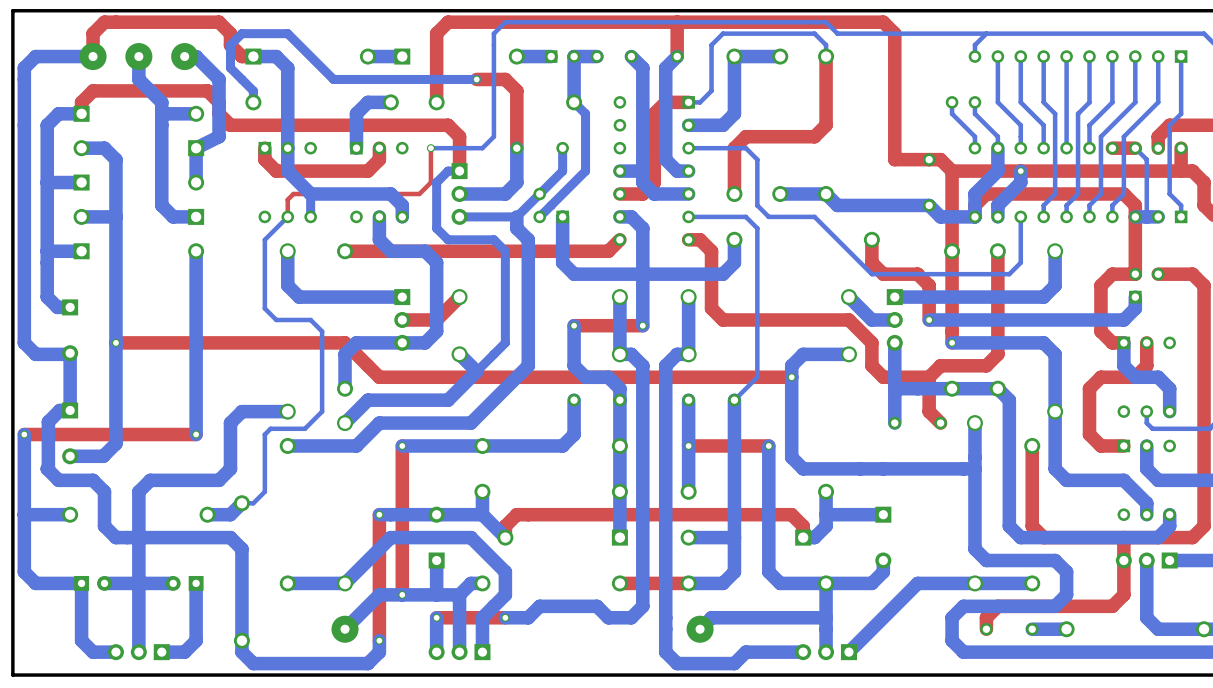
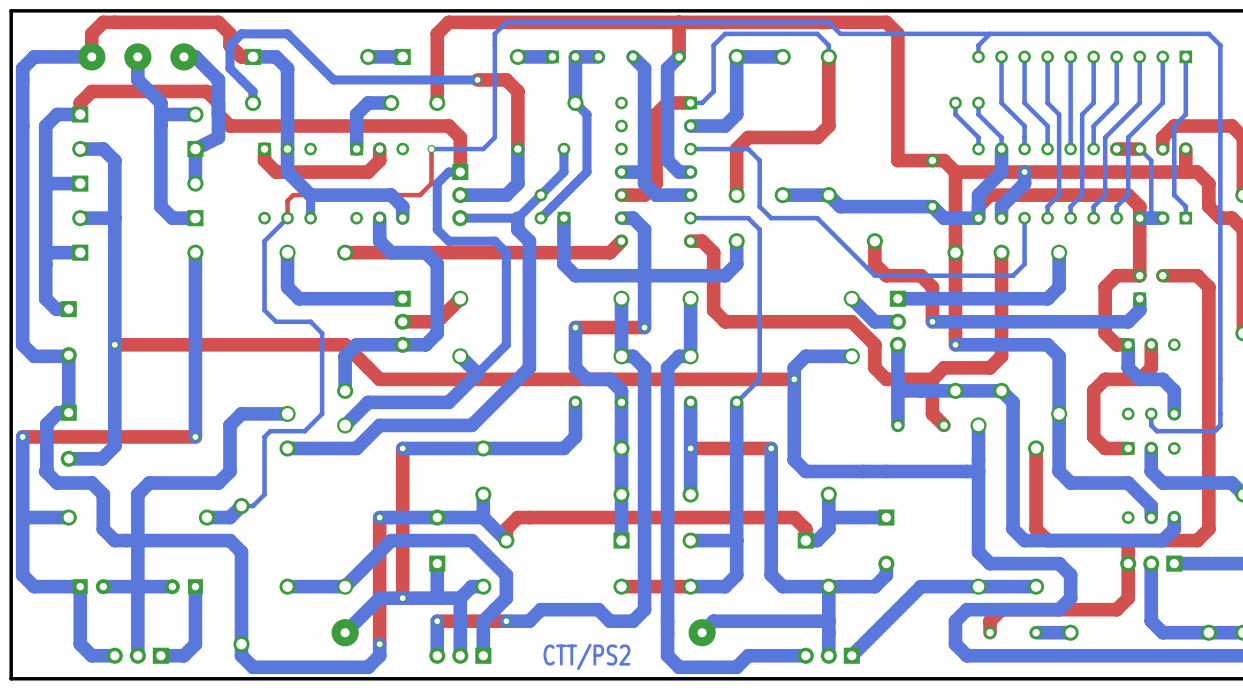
text: none -> CTT/PS2 (586, 656)

